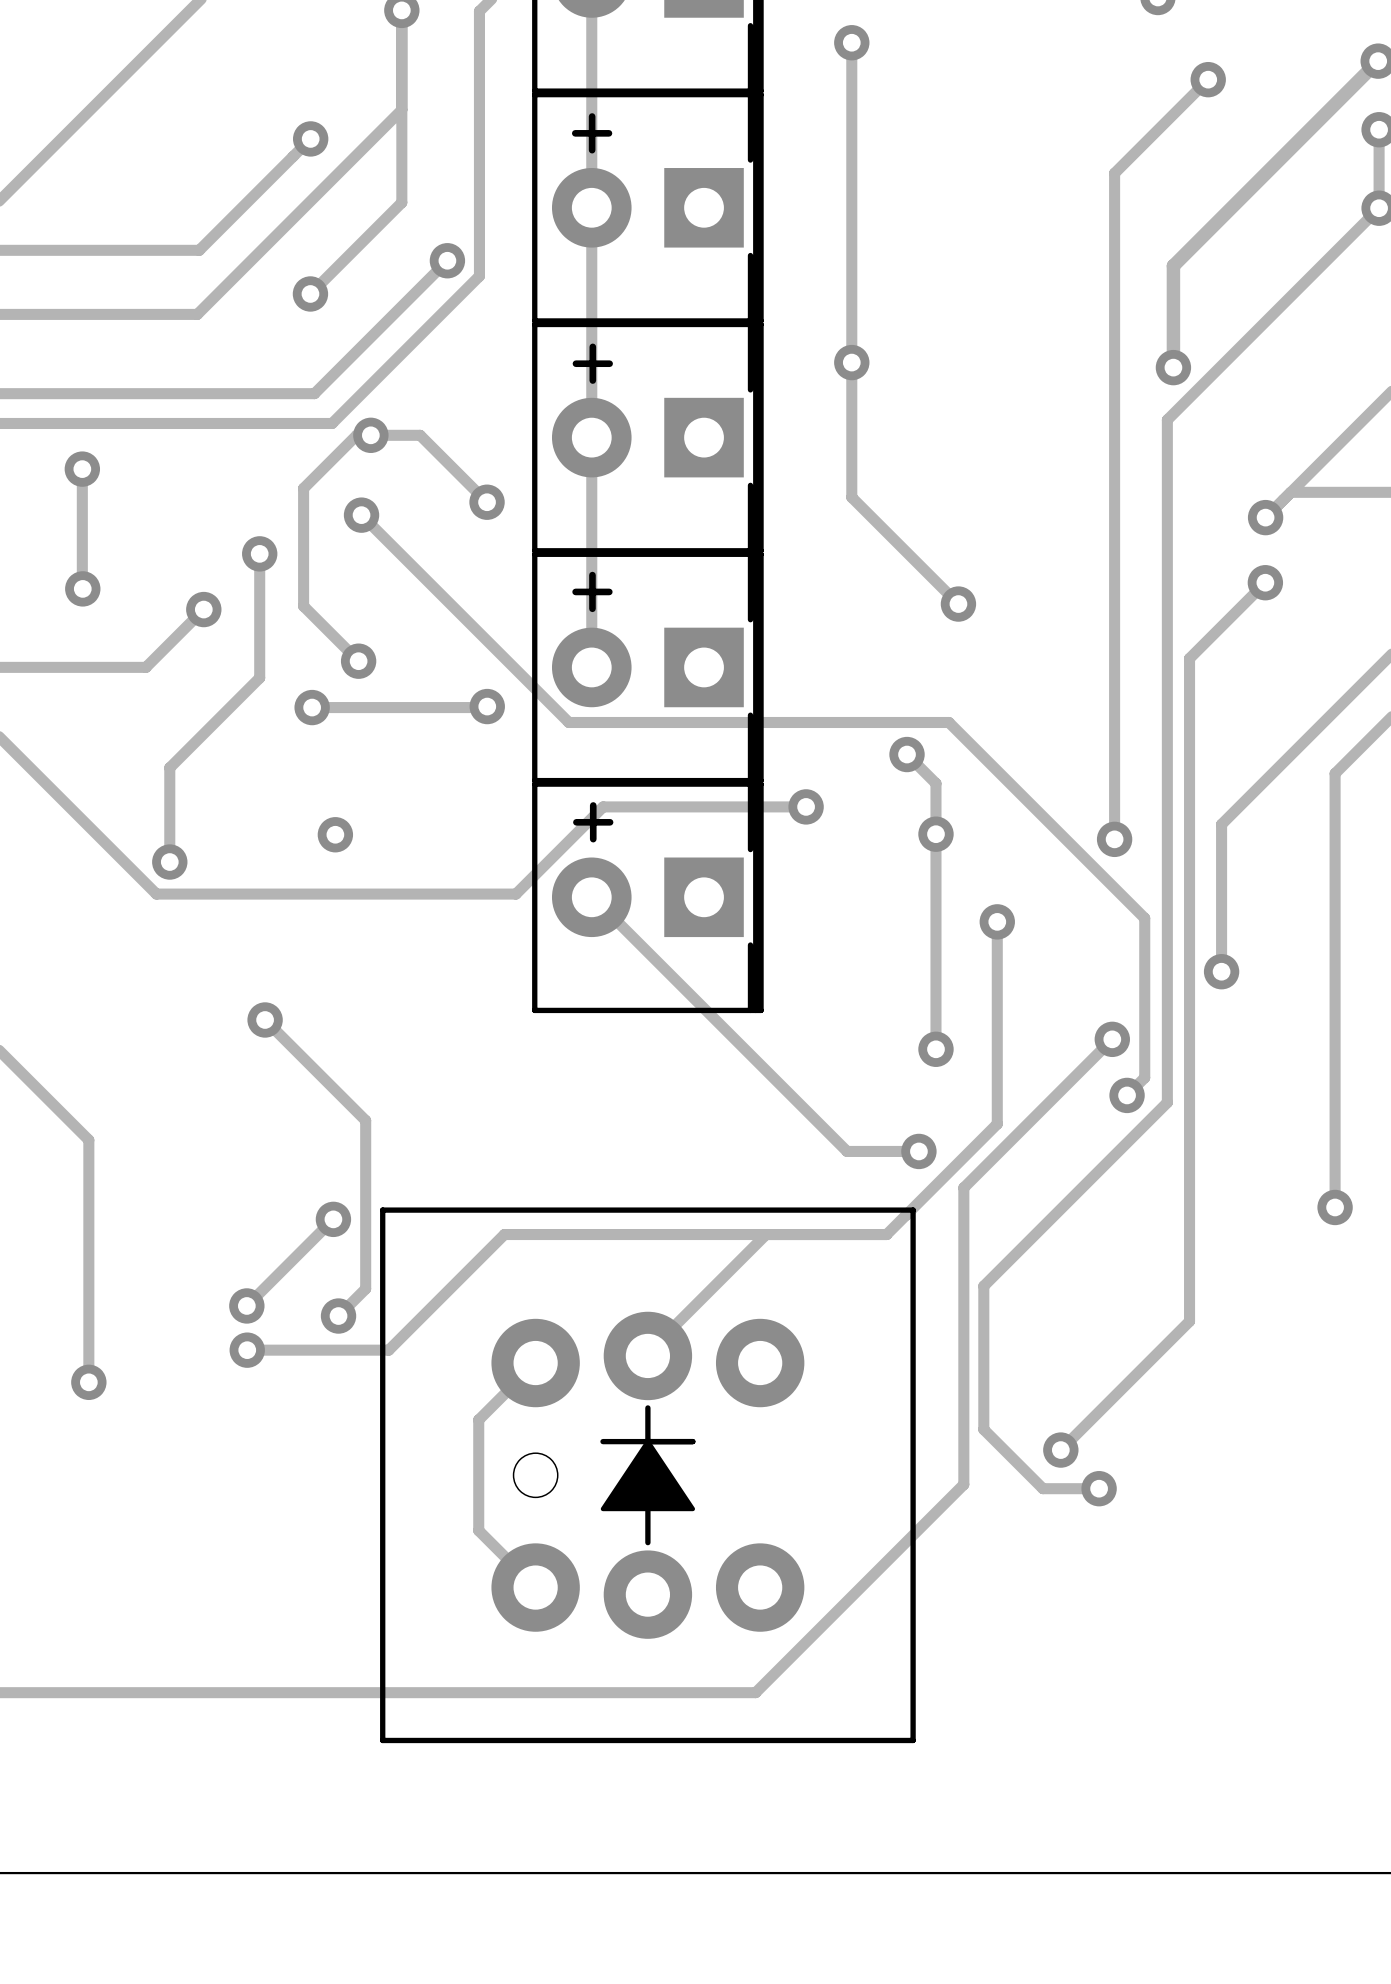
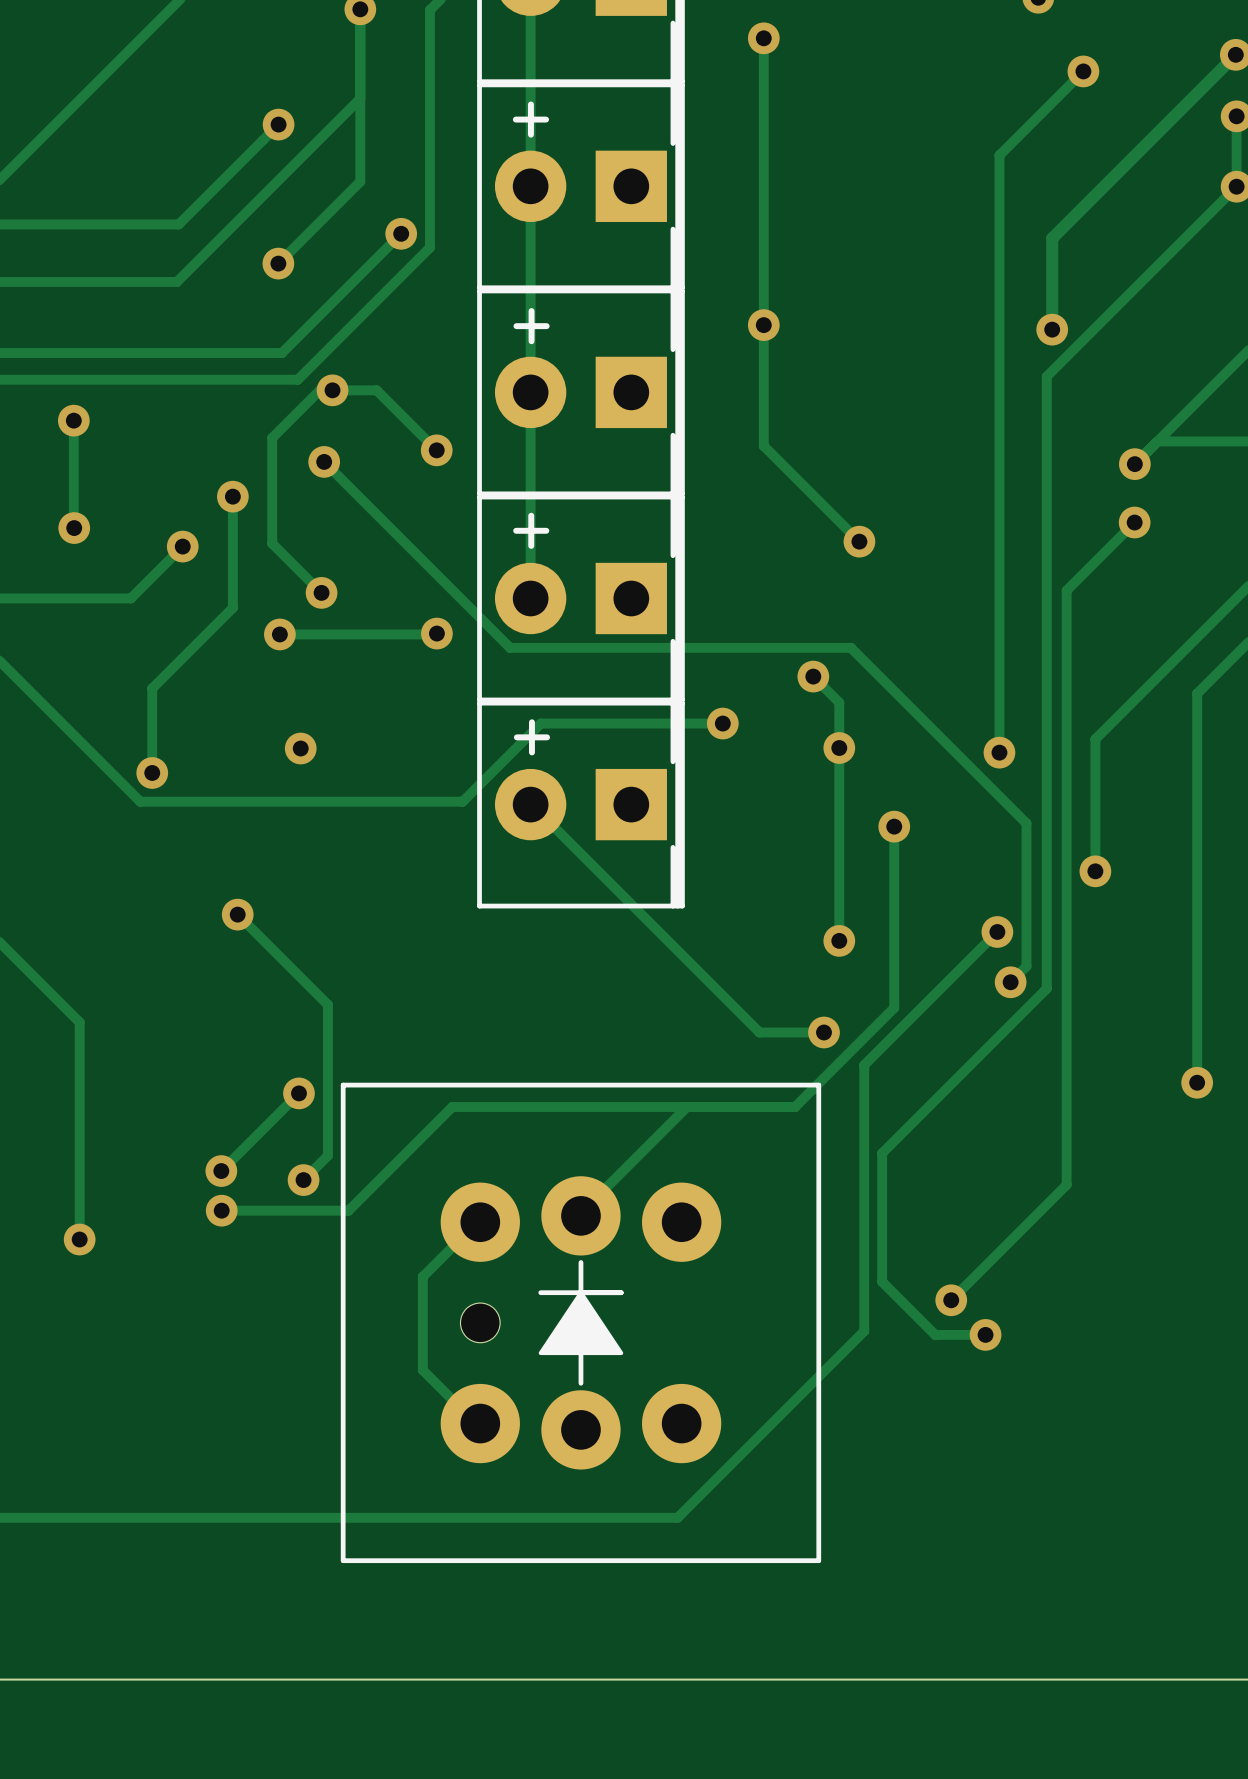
track: none -> (476, 1222) (422, 1276) (422, 1370) (476, 1424)
track: (535, 1363) (478, 1419) (478, 1530) (535, 1587) -> none

